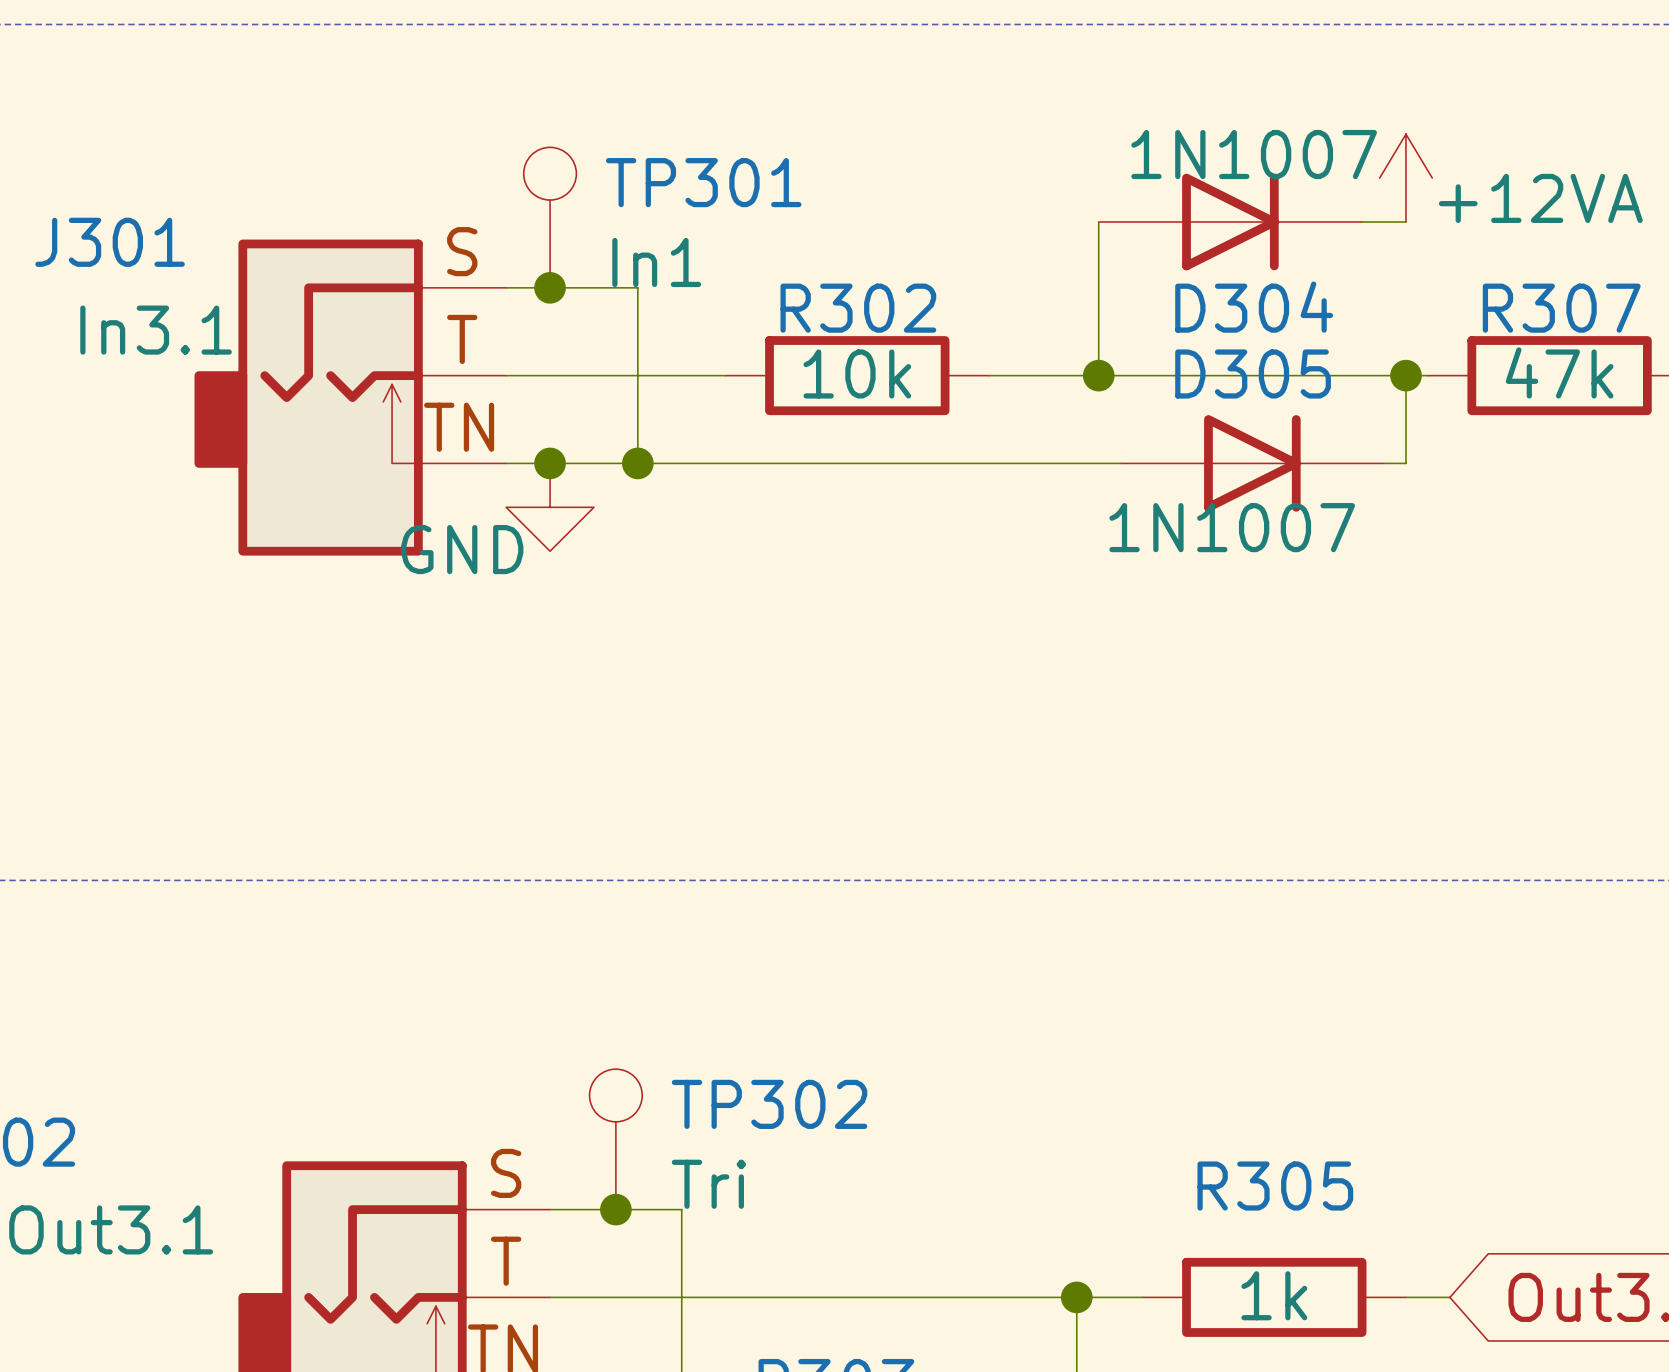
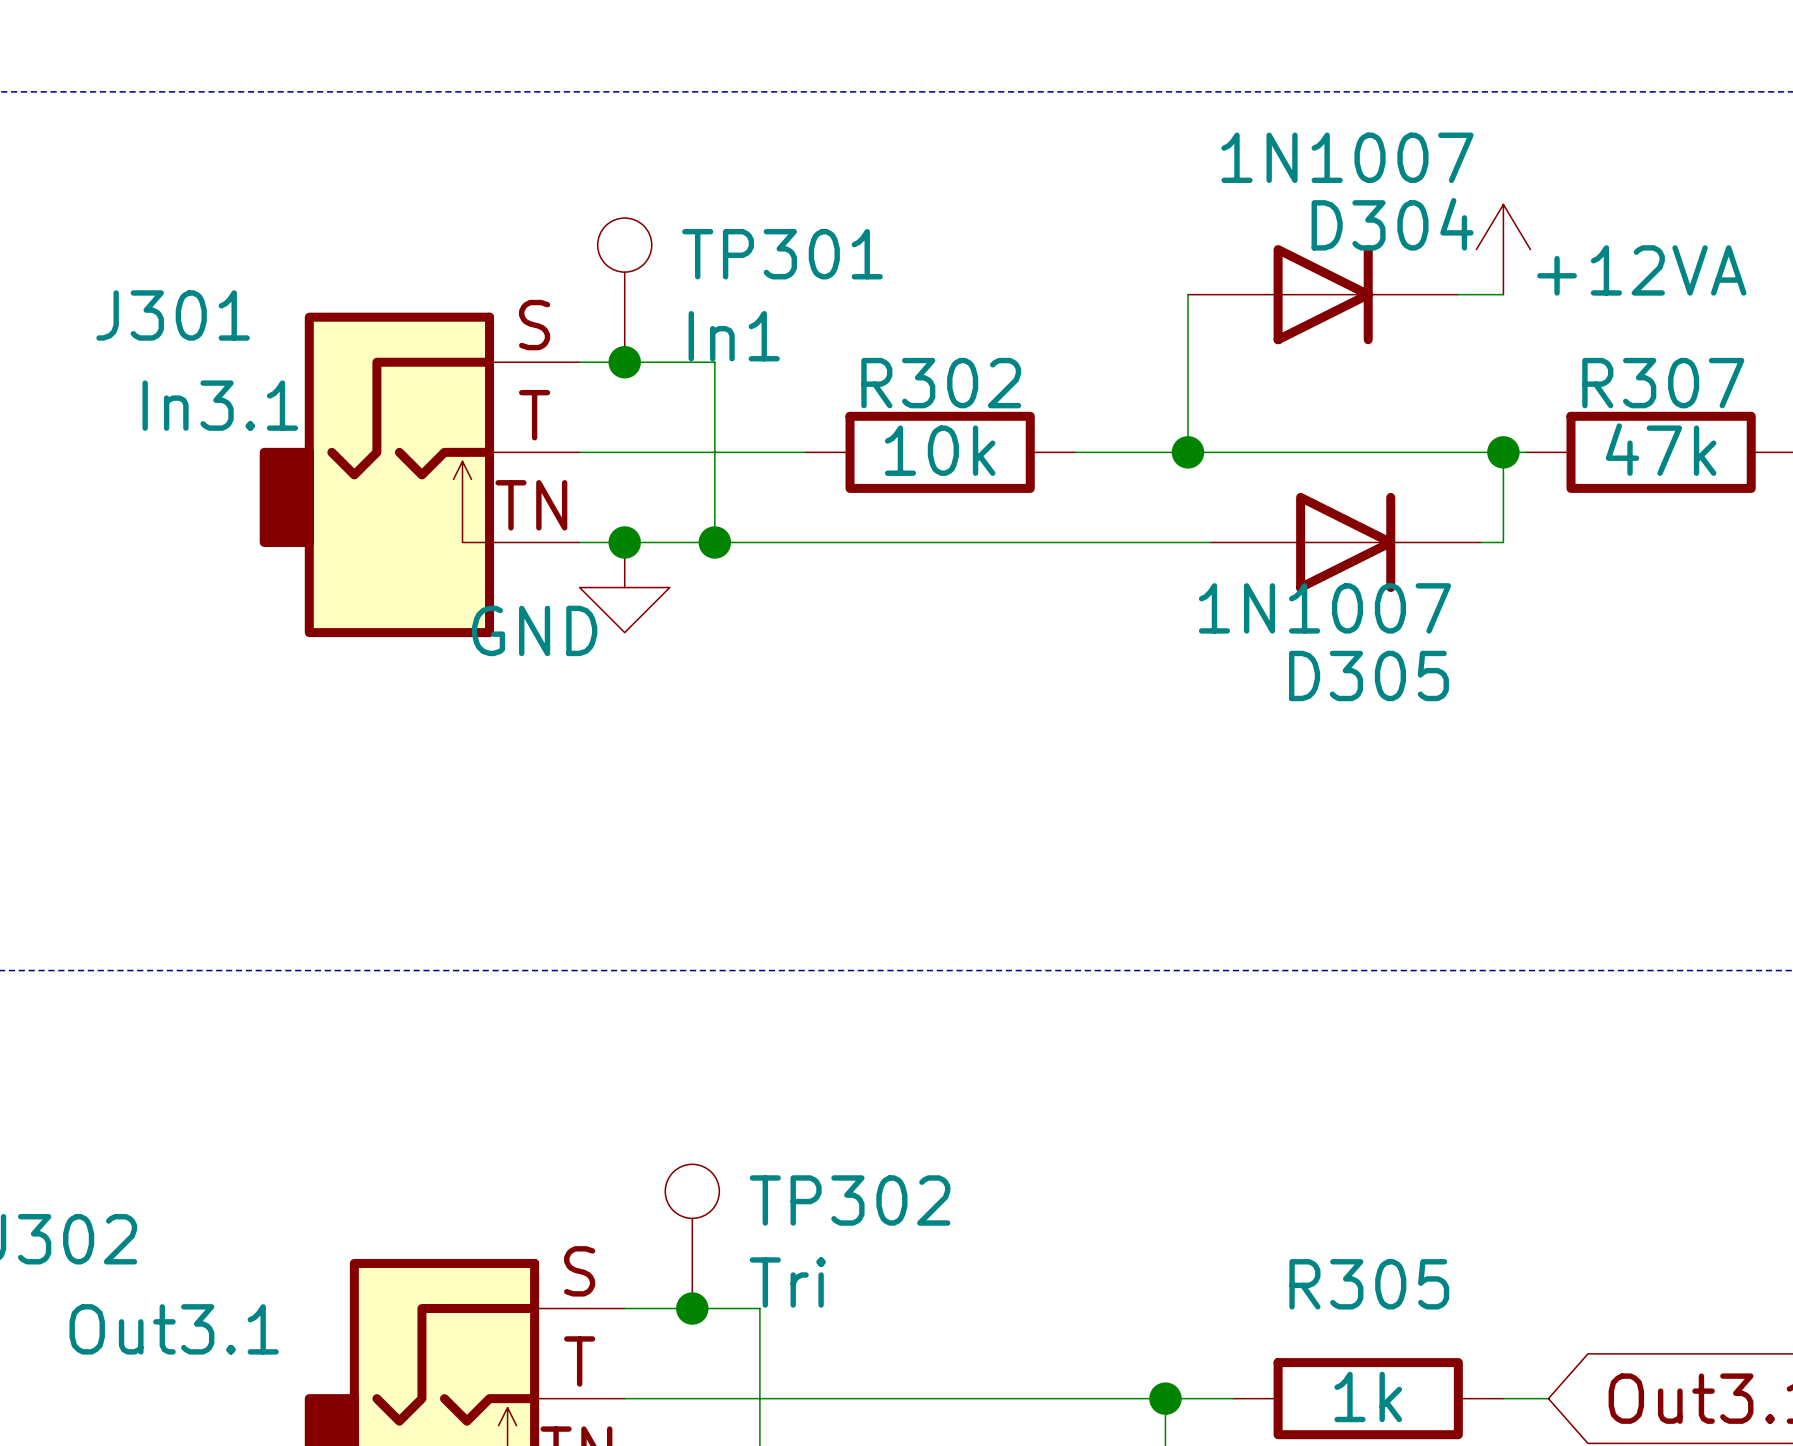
D304 value position: 1N1007 (1254, 154) -> 1N1007 (1347, 157)
D304 name position: D304 (1254, 307) -> D304 (1392, 224)
D305 name position: D305 (1253, 373) -> D305 (1368, 675)

